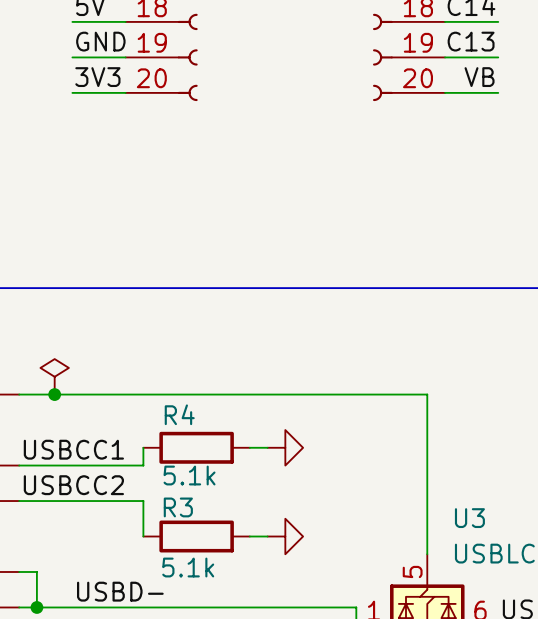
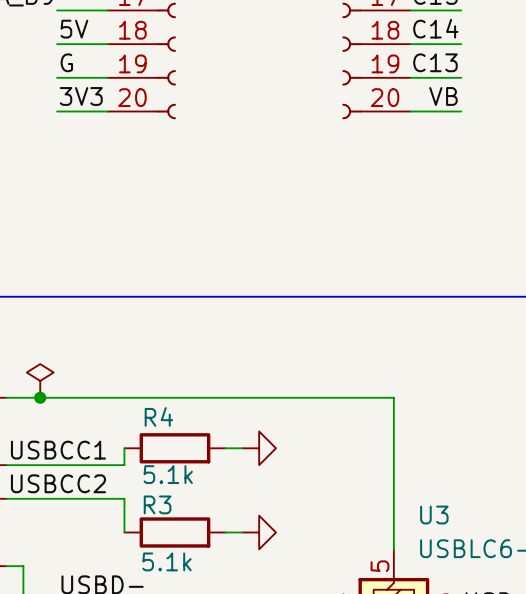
label: GND (100, 41) -> G (66, 62)

